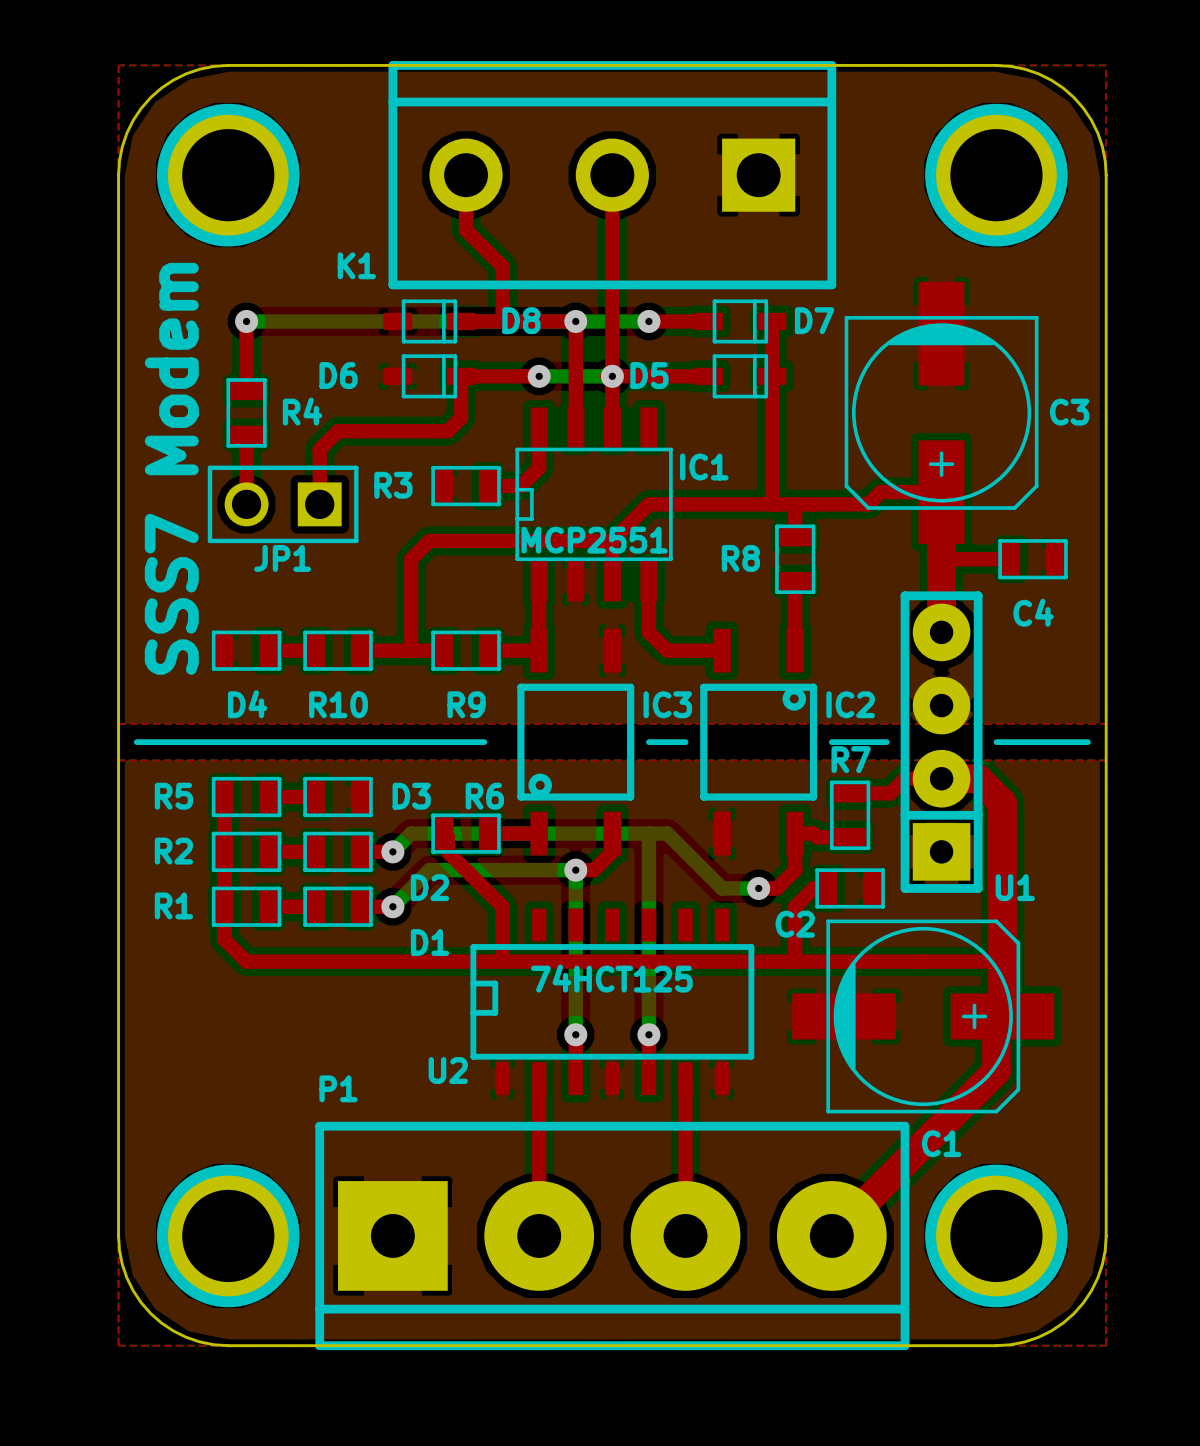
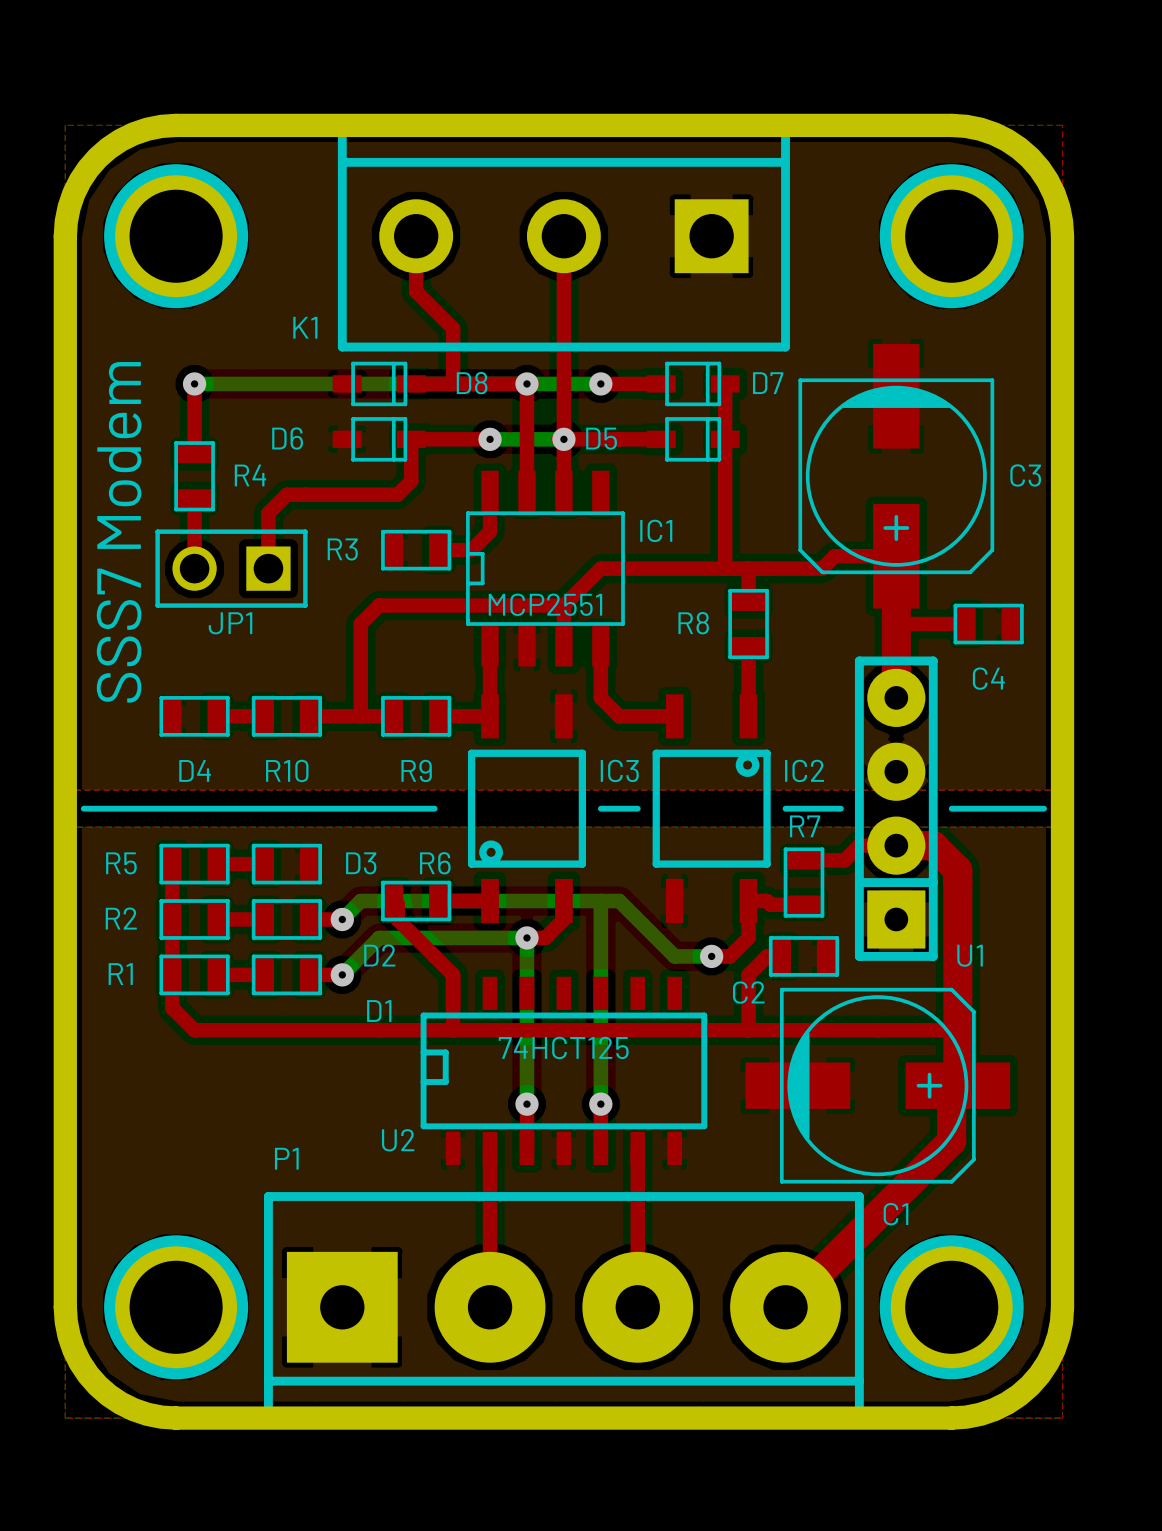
board edge width: thin (1106, 175) (1106, 1235) (1102, 1264) (1097, 1277) (1083, 1302) (1074, 1313) (1051, 1330) (1038, 1337) (1010, 1344) (996, 1345) (213, 1344) (186, 1337) (173, 1330) (150, 1313) (133, 1290) (126, 1277) (122, 1264) (118, 1235) -> thick (1062, 236) (1062, 1307) (1058, 1335) (1054, 1349) (1039, 1374) (1030, 1385) (1007, 1403) (994, 1409) (966, 1417) (951, 1418) (161, 1417) (133, 1409) (120, 1403) (97, 1385) (80, 1362) (73, 1349) (69, 1335) (65, 1307)
board edge width: thin (1106, 175) (1102, 146) (1091, 120) (1083, 108) (1074, 97) (1051, 80) (1038, 73) (1010, 66) (228, 65) (199, 69) (186, 73) (161, 88) (150, 97) (141, 108) (126, 133) (119, 160) (118, 175) (118, 1235) -> thick (1062, 236) (1058, 207) (1047, 180) (1039, 168) (1030, 157) (1007, 140) (994, 133) (966, 126) (176, 125) (147, 129) (133, 133) (108, 148) (97, 157) (88, 168) (73, 193) (66, 221) (65, 236) (65, 1307)

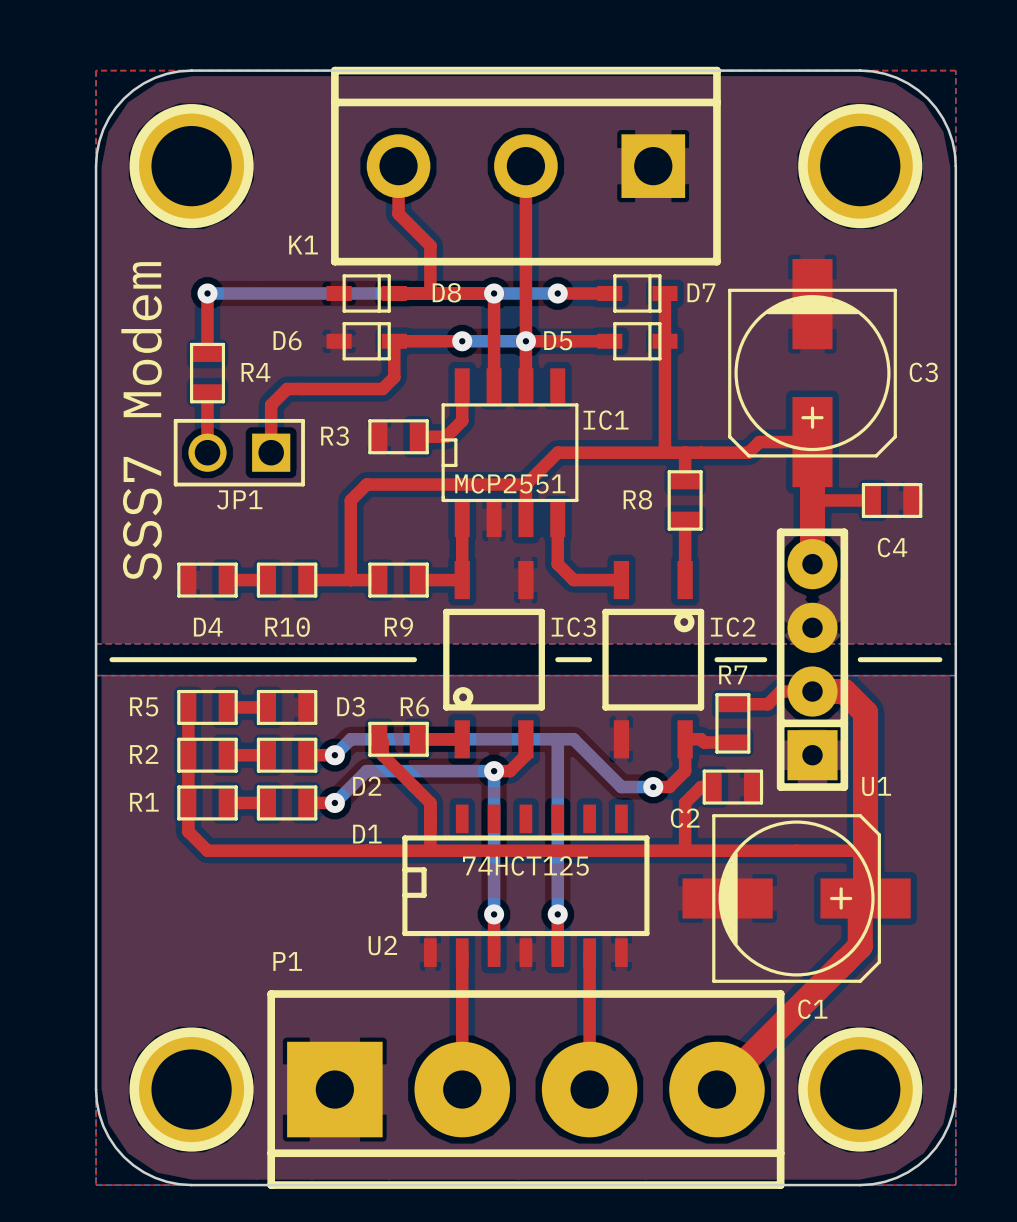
board edge width: thick (1062, 236) (1062, 1307) (1058, 1335) (1054, 1349) (1039, 1374) (1030, 1385) (1007, 1403) (994, 1409) (966, 1417) (951, 1418) (161, 1417) (133, 1409) (120, 1403) (97, 1385) (80, 1362) (73, 1349) (69, 1335) (65, 1307) -> thin (955, 166) (955, 1089) (952, 1114) (948, 1126) (936, 1147) (927, 1157) (908, 1172) (896, 1177) (872, 1184) (860, 1185) (179, 1184) (155, 1177) (143, 1172) (124, 1157) (108, 1137) (103, 1126) (99, 1114) (96, 1089)
board edge width: thick (1062, 236) (1058, 207) (1047, 180) (1039, 168) (1030, 157) (1007, 140) (994, 133) (966, 126) (176, 125) (147, 129) (133, 133) (108, 148) (97, 157) (88, 168) (73, 193) (66, 221) (65, 236) (65, 1307) -> thin (955, 166) (952, 141) (942, 118) (936, 107) (927, 98) (908, 83) (896, 77) (872, 71) (191, 70) (166, 73) (155, 77) (133, 90) (124, 98) (115, 107) (103, 129) (96, 153) (96, 166) (96, 1089)

